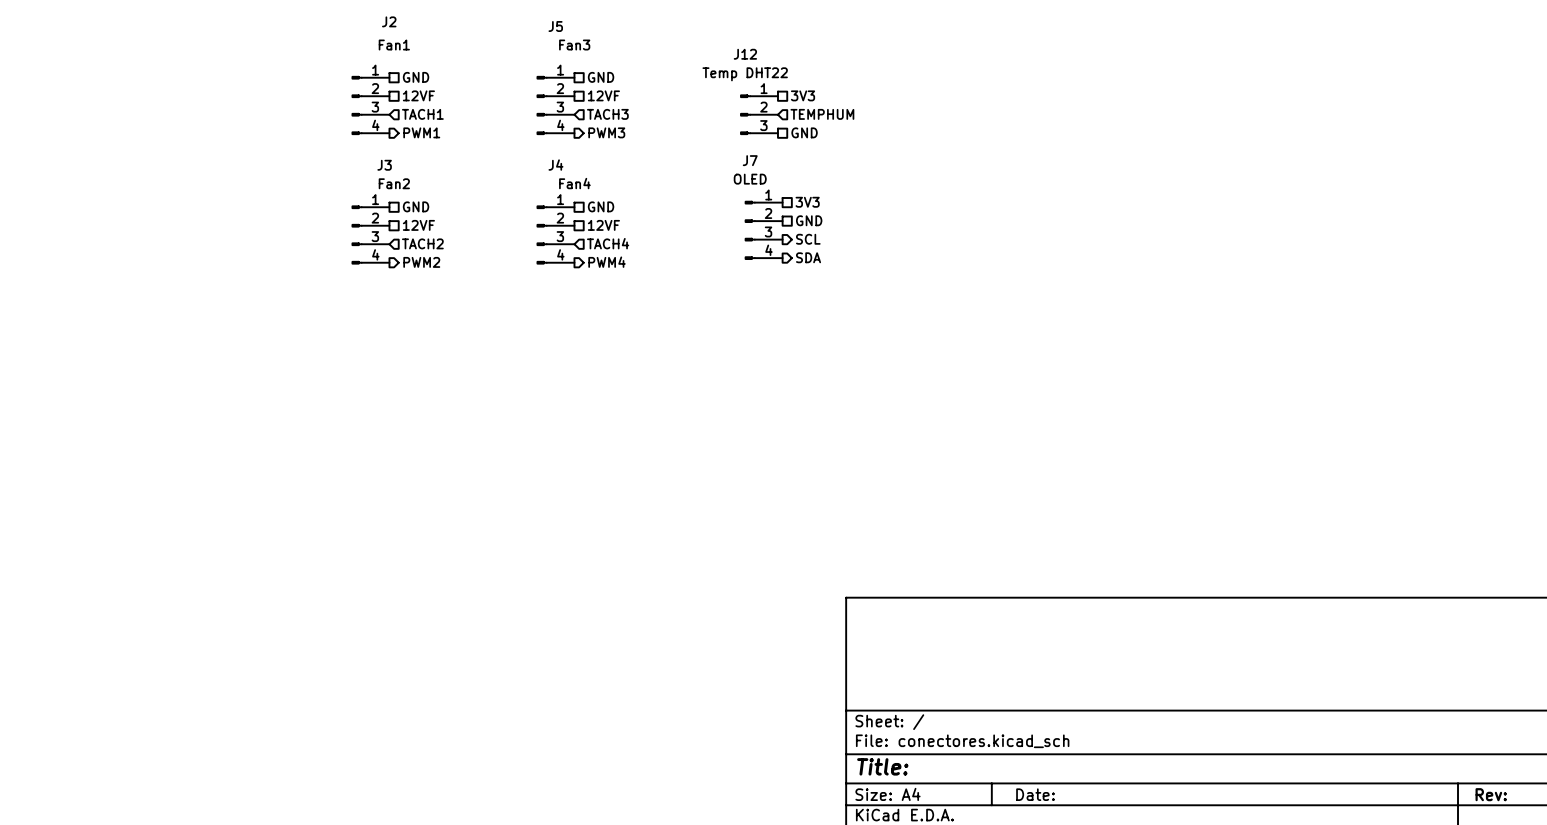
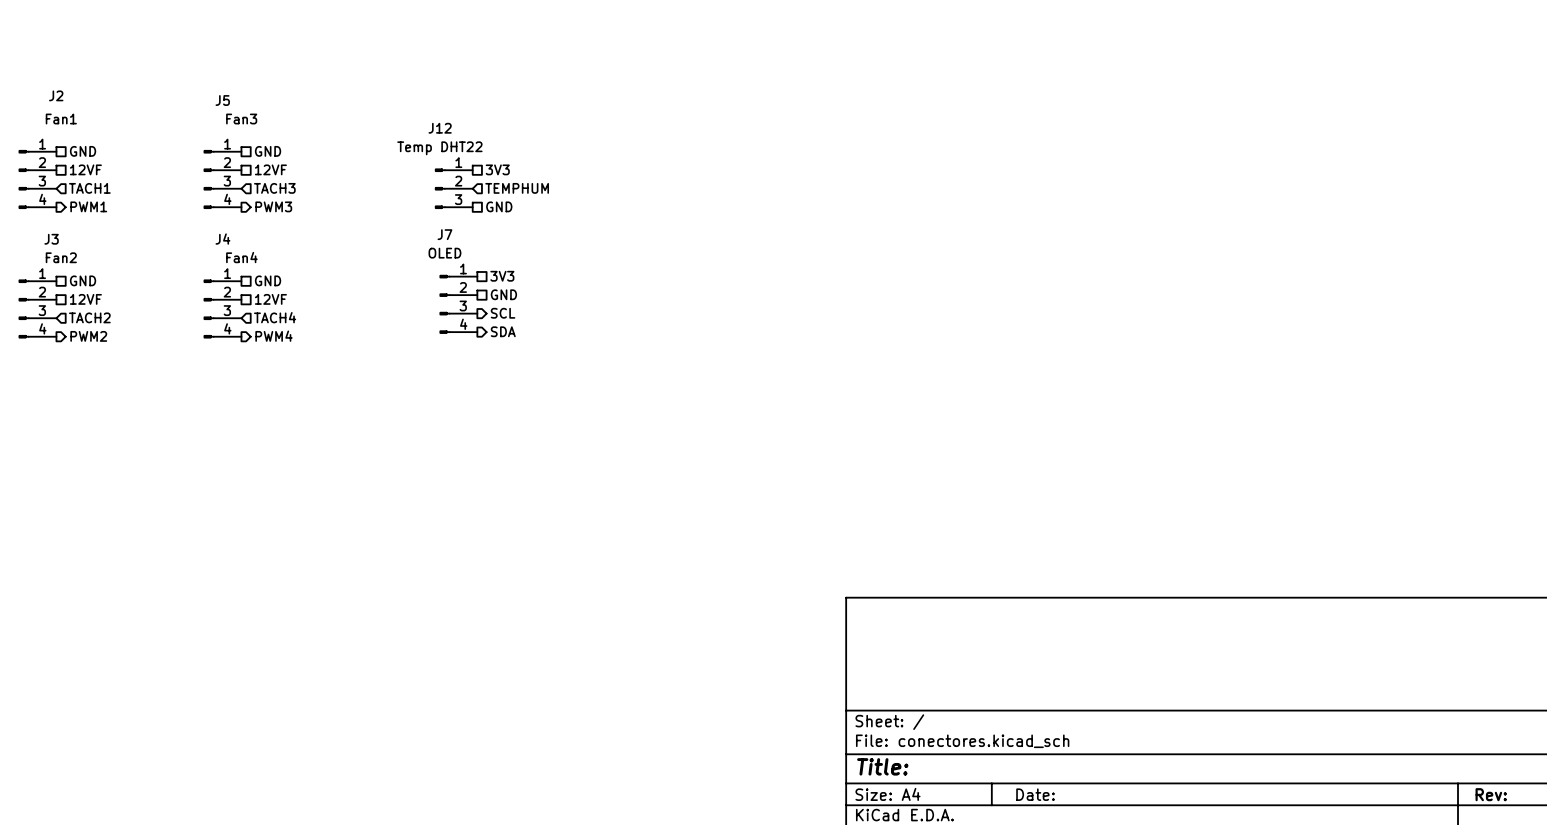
hierarchical label: GND (416, 77) -> none
hierarchical label: GND (601, 77) -> none
hierarchical label: 12VF (418, 95) -> none
hierarchical label: 12VF (603, 95) -> none
hierarchical label: 3V3 (803, 95) -> none
J2 position: (370, 105) -> (37, 179)
J5 position: (555, 105) -> (222, 179)
hierarchical label: TACH1 (422, 114) -> none
hierarchical label: TACH3 (607, 114) -> none
J12 position: (759, 114) -> (453, 188)
hierarchical label: TEMPHUM (822, 114) -> none
hierarchical label: PWM1 (421, 132) -> none
hierarchical label: PWM3 (606, 132) -> none
hierarchical label: GND (804, 132) -> none
hierarchical label: none -> GND (83, 151)
hierarchical label: none -> GND (268, 151)
hierarchical label: none -> 12VF (85, 169)
hierarchical label: none -> 12VF (270, 169)
hierarchical label: none -> 3V3 (497, 169)
hierarchical label: none -> TACH1 (89, 188)
hierarchical label: none -> TACH3 (274, 188)
hierarchical label: none -> TEMPHUM (517, 188)
hierarchical label: 3V3 (807, 202) -> none
hierarchical label: none -> PWM1 (88, 206)
hierarchical label: none -> PWM3 (273, 206)
hierarchical label: GND (416, 206) -> none
hierarchical label: none -> GND (499, 206)
hierarchical label: GND (601, 206) -> none
hierarchical label: GND (809, 220) -> none
hierarchical label: 12VF (418, 225) -> none
hierarchical label: 12VF (603, 225) -> none
J7 position: (763, 230) -> (458, 304)
J3 position: (370, 234) -> (37, 308)
J4 position: (555, 234) -> (222, 308)
hierarchical label: SCL (808, 239) -> none
hierarchical label: TACH2 (422, 243) -> none
hierarchical label: TACH4 (608, 243) -> none
hierarchical label: SDA (808, 257) -> none
hierarchical label: PWM2 (421, 262) -> none
hierarchical label: PWM4 (606, 262) -> none
hierarchical label: none -> 3V3 (502, 276)
hierarchical label: none -> GND (83, 280)
hierarchical label: none -> GND (268, 280)
hierarchical label: none -> GND (503, 294)
hierarchical label: none -> 12VF (85, 299)
hierarchical label: none -> 12VF (270, 299)
hierarchical label: none -> SCL (503, 313)
hierarchical label: none -> TACH2 (89, 317)
hierarchical label: none -> TACH4 (275, 317)
hierarchical label: none -> SDA (503, 331)
hierarchical label: none -> PWM2 (88, 336)
hierarchical label: none -> PWM4 (273, 336)

